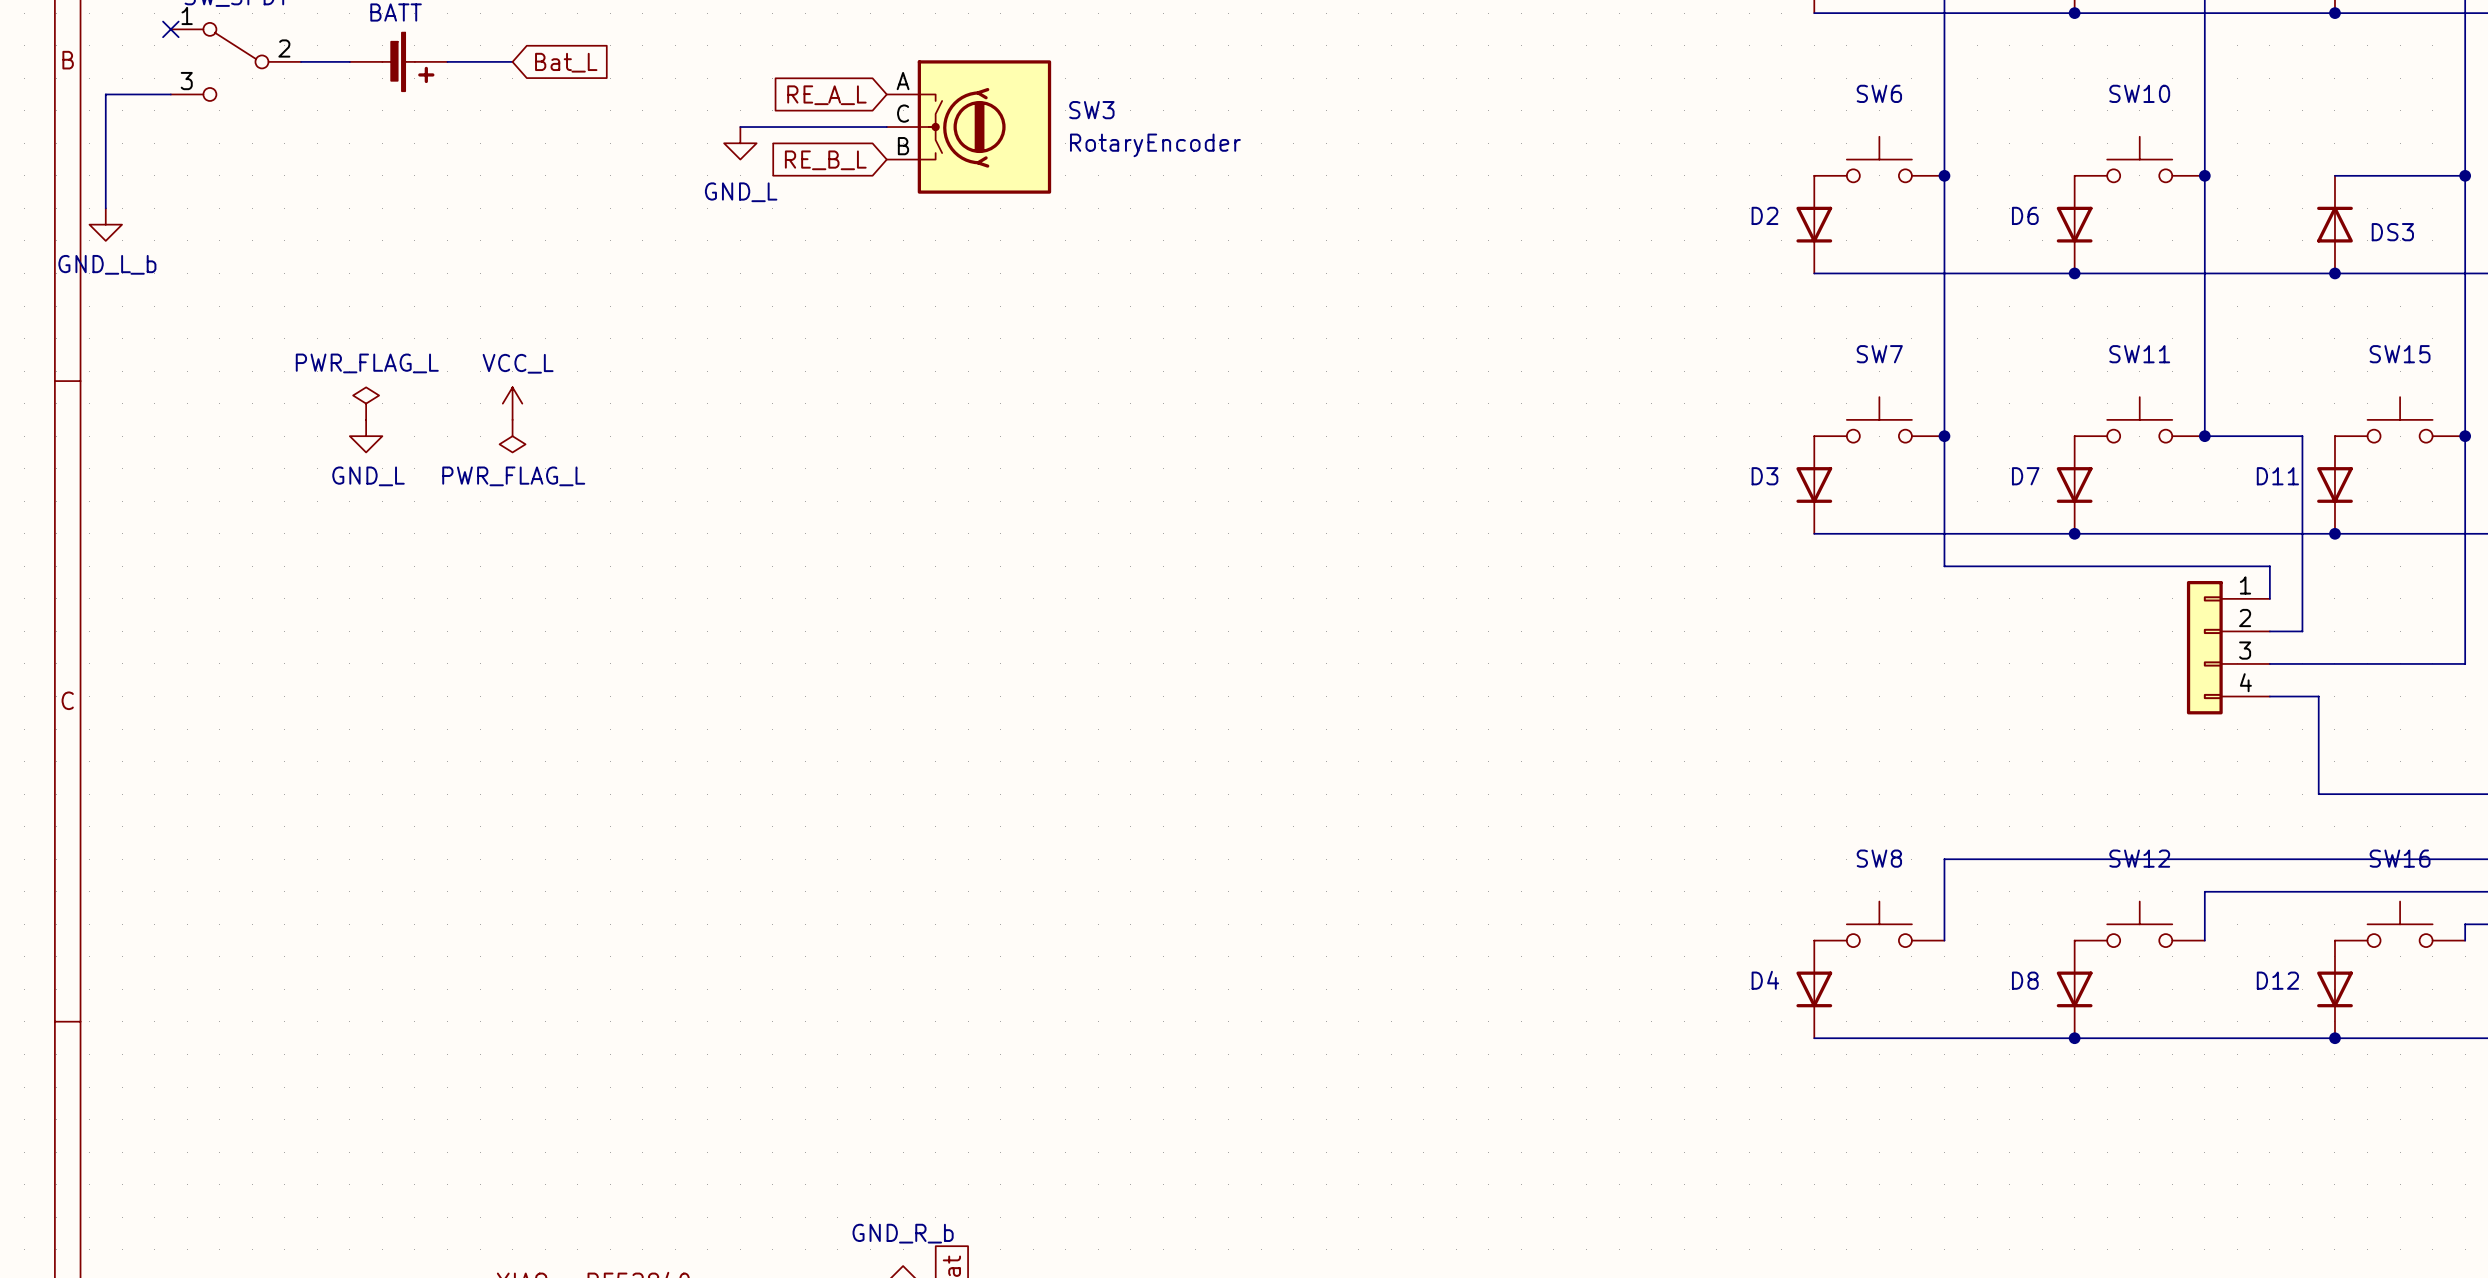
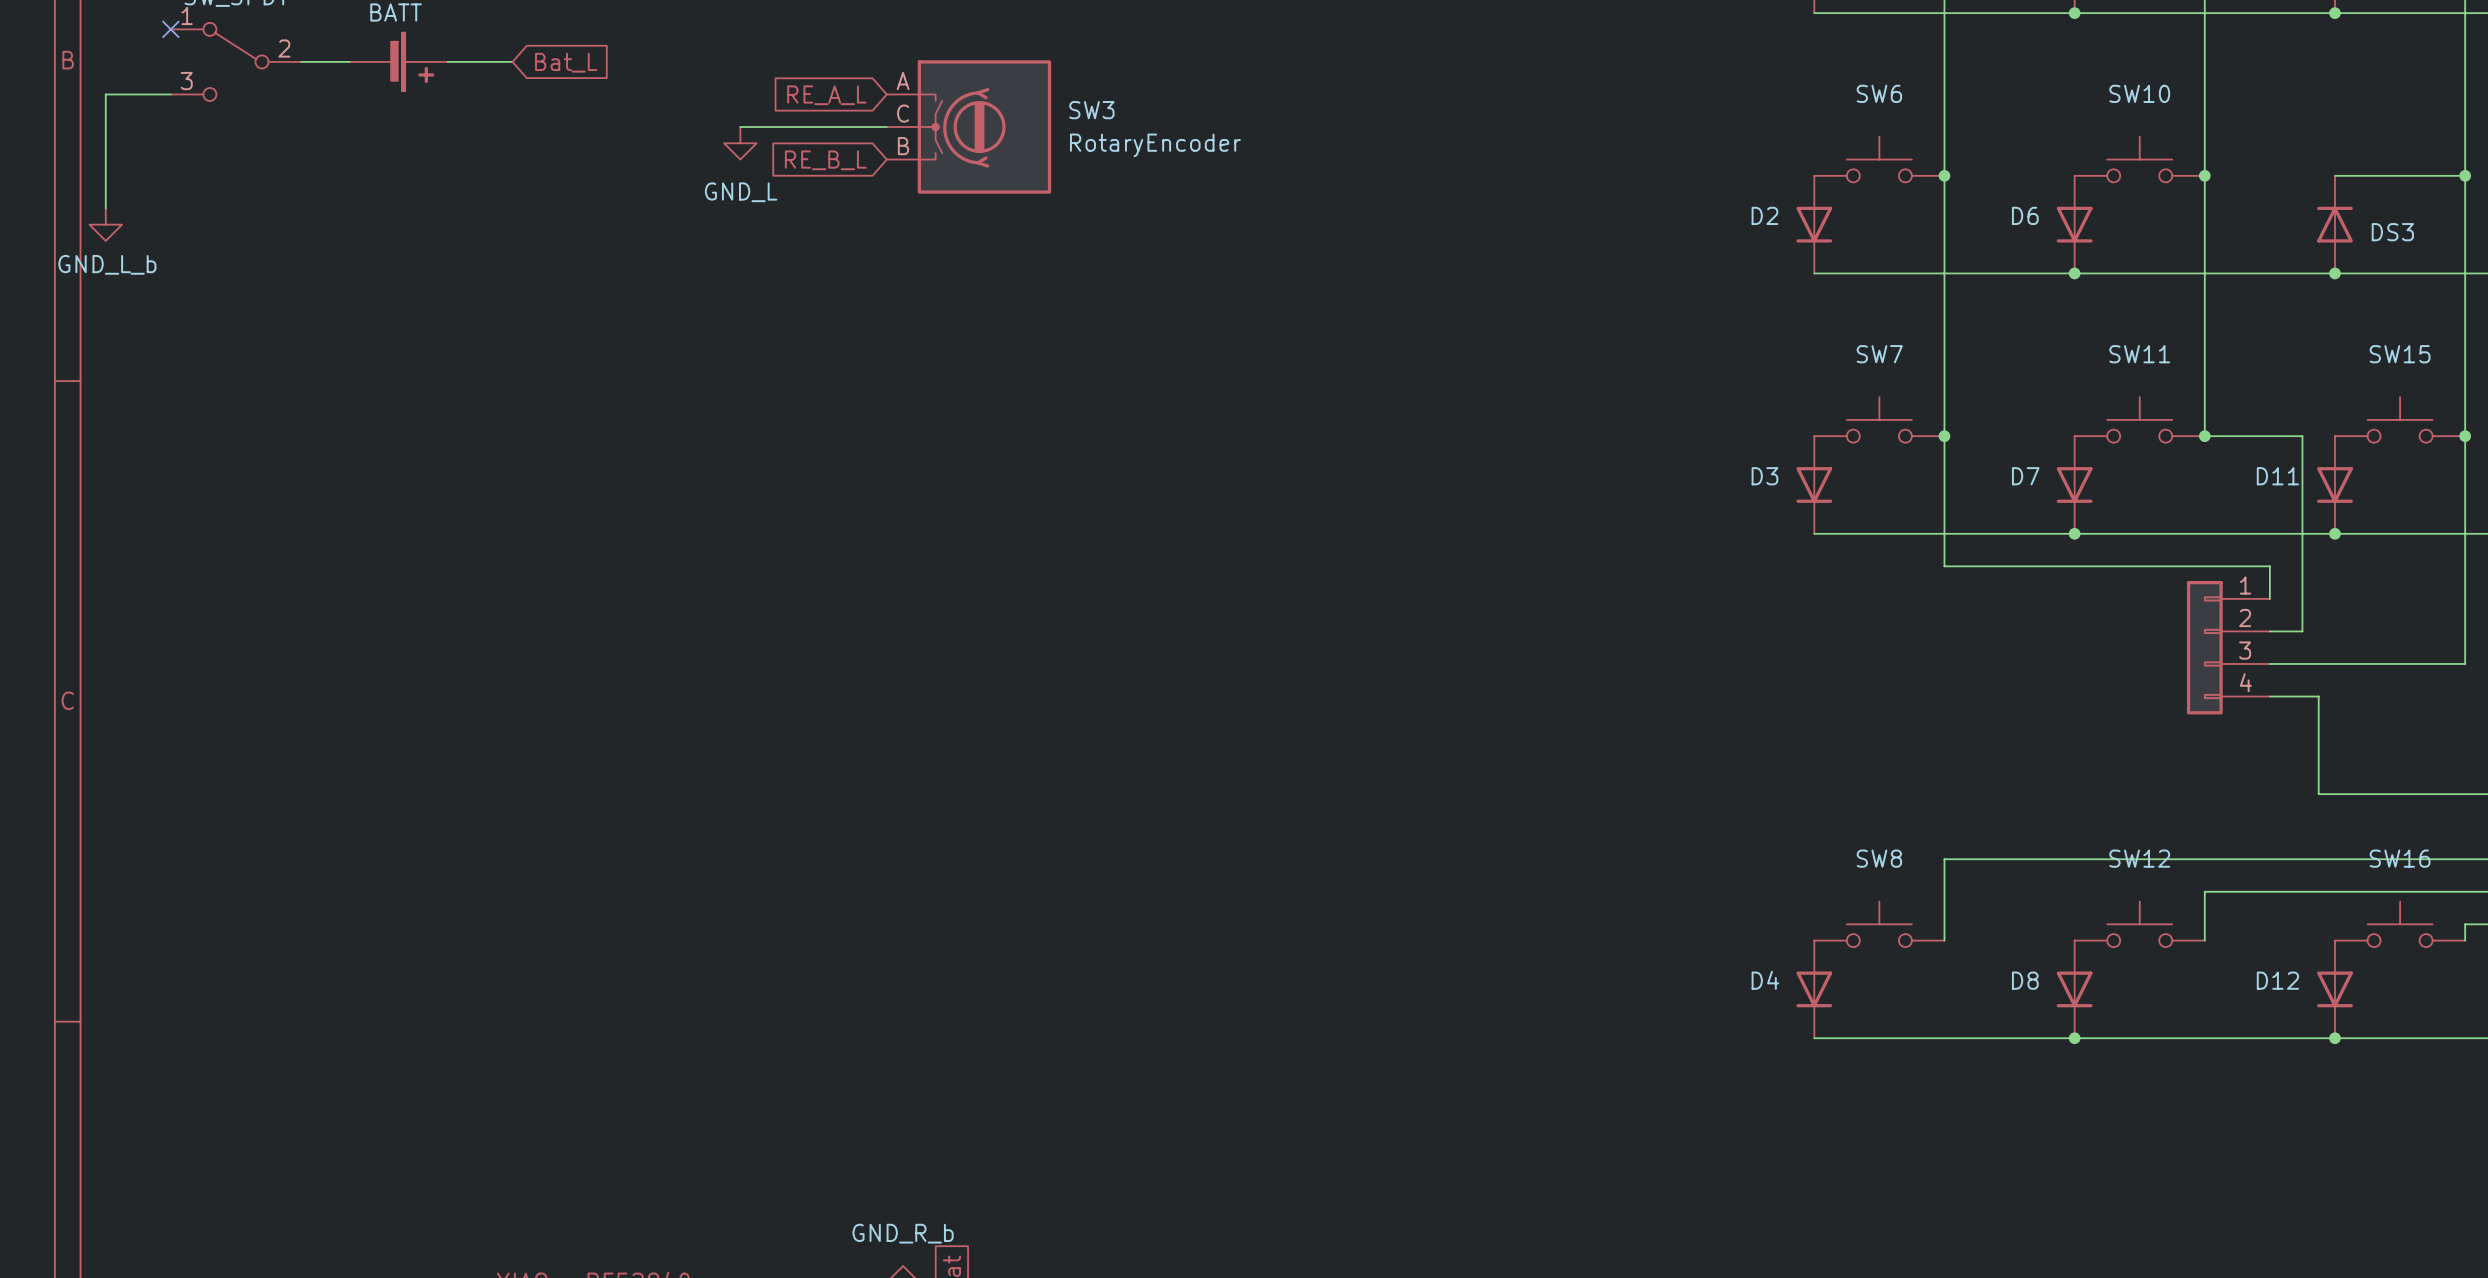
power symbol: PWR_FLAG_L (366, 403) -> none
power symbol: VCC_L (512, 403) -> none
power symbol: GND_L (366, 436) -> none
power symbol: PWR_FLAG_L (512, 436) -> none

